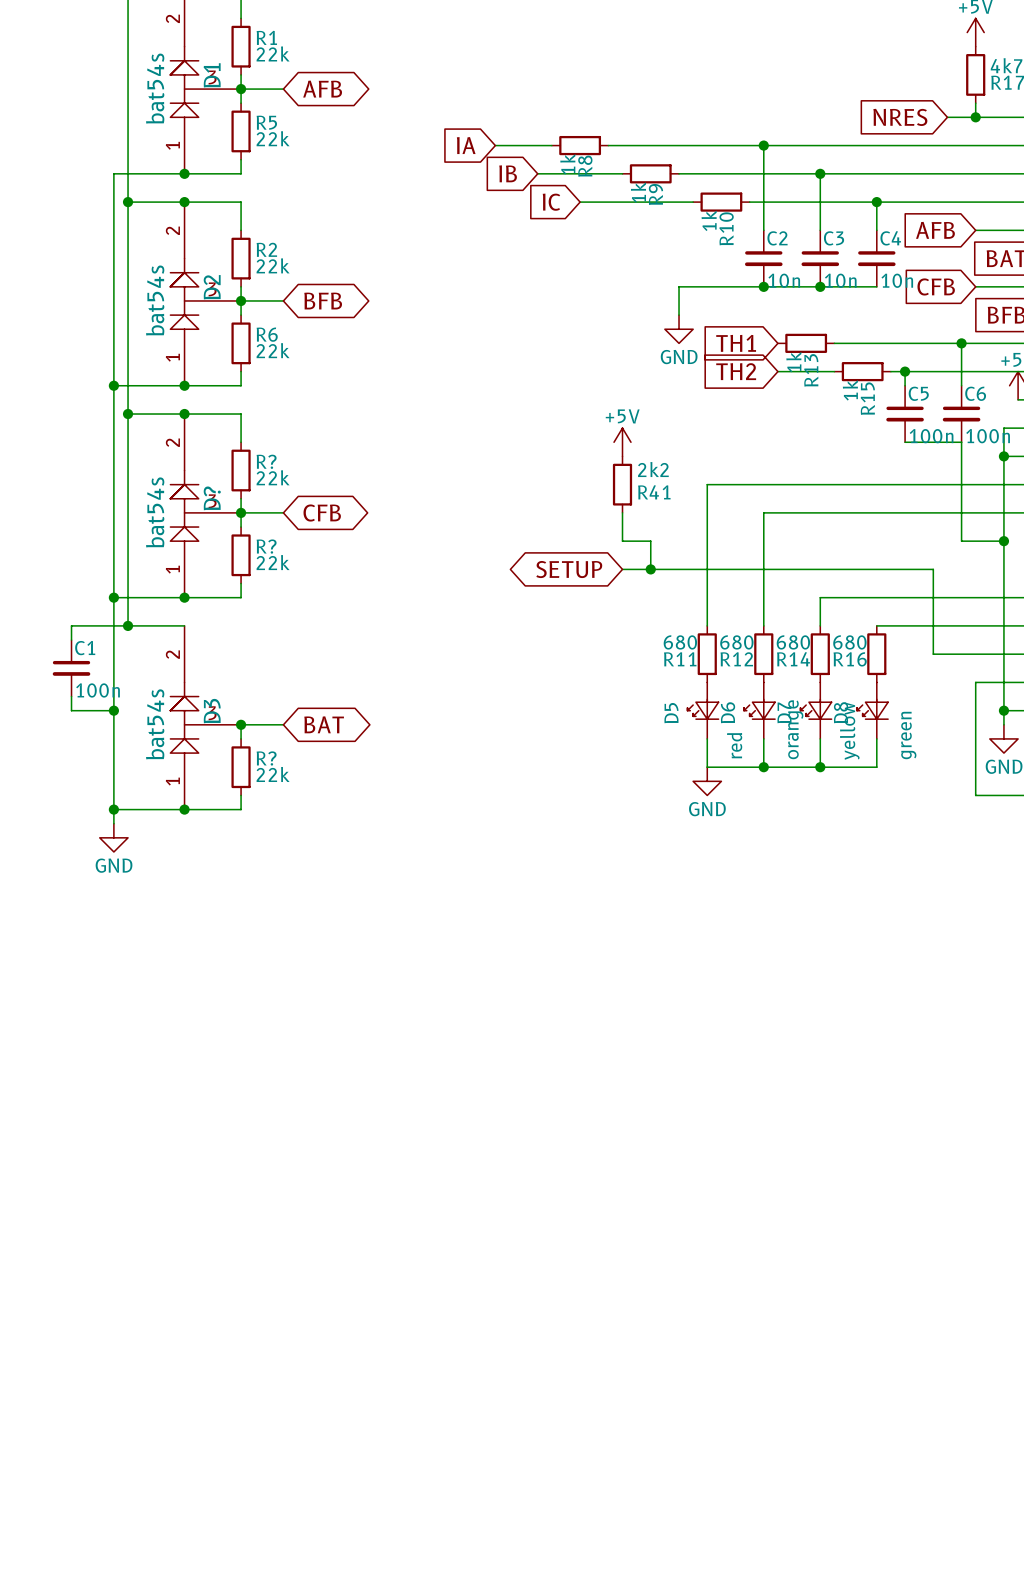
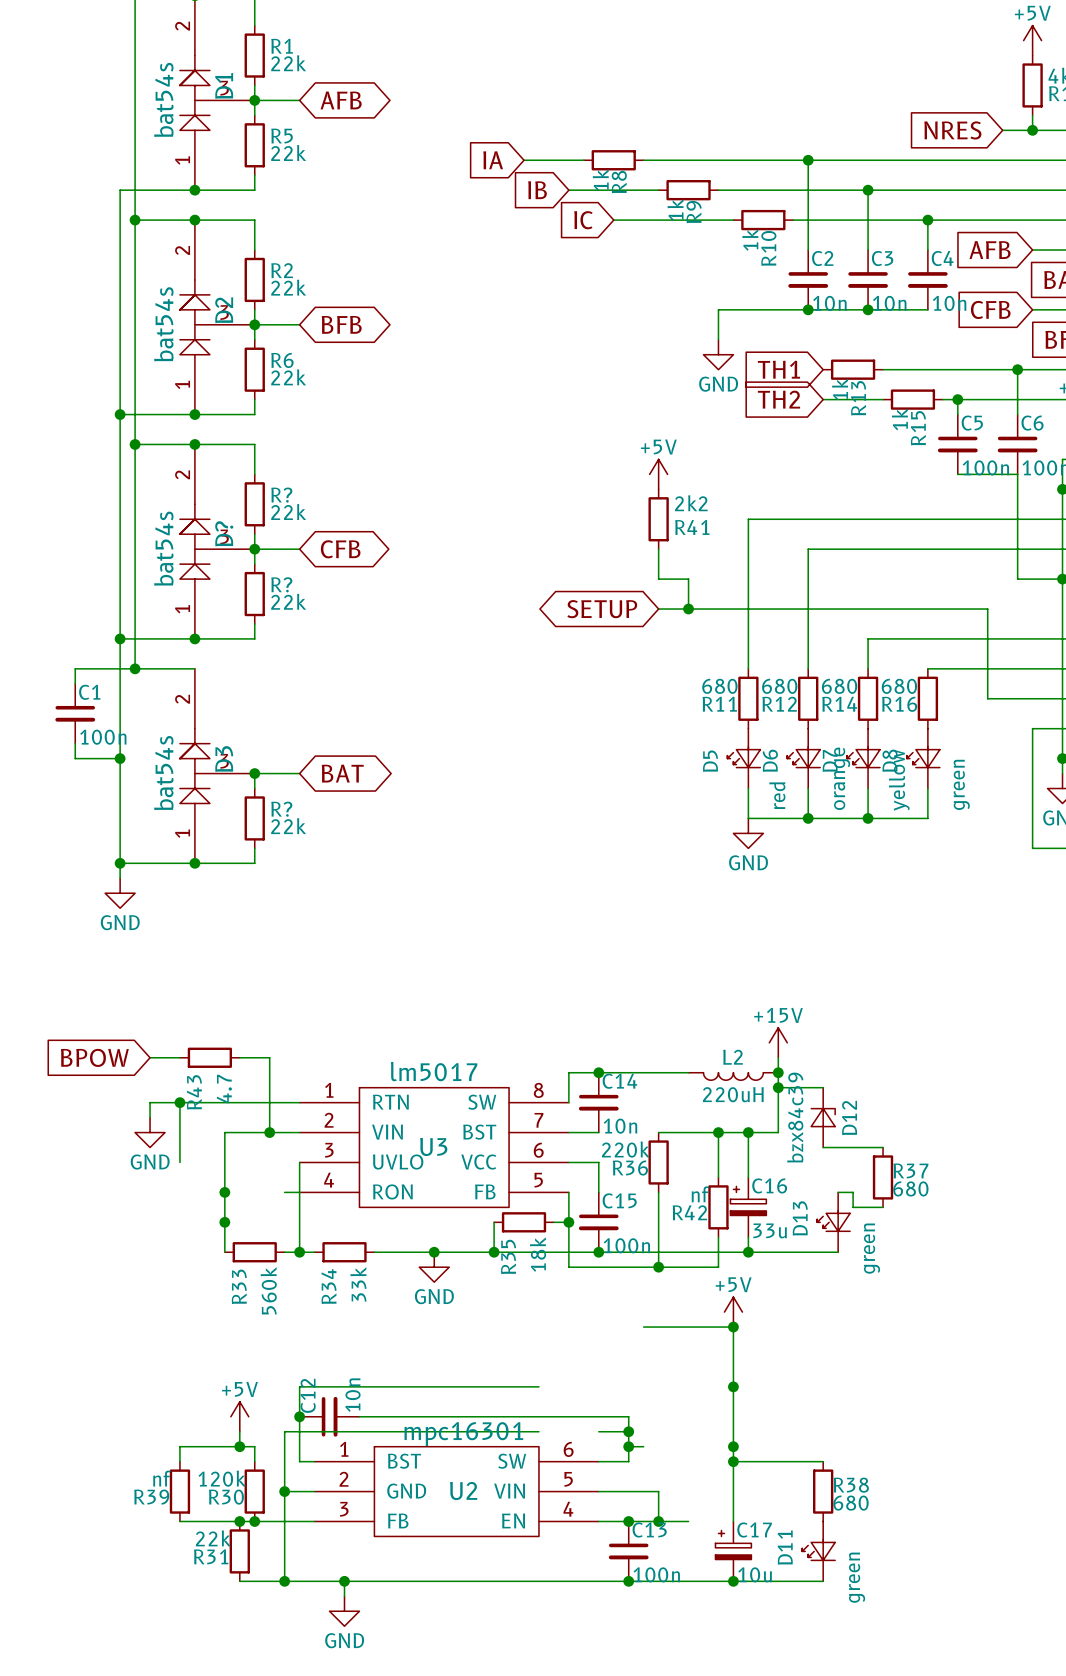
power symbol: none -> +15V (778, 1042)
global label: none -> BPOW (94, 1057)
wire: none -> (150, 1057) (179, 1057)
R43: none -> 4.7 (209, 1057)
wire: none -> (239, 1057) (269, 1057) (269, 1132)
wire: none -> (778, 1057) (778, 1132) (658, 1132)
junction: none -> (598, 1072)
wire: none -> (688, 1072) (568, 1072) (568, 1102)
junction: none -> (778, 1072)
L2: none -> 220uH (733, 1076)
wire: none -> (778, 1087) (823, 1087)
junction: none -> (778, 1087)
wire: none -> (179, 1102) (179, 1162)
junction: none -> (179, 1102)
wire: none -> (299, 1102) (150, 1102) (150, 1117)
C14: none -> 10n (598, 1102)
D12: none -> bzx84c39 (823, 1117)
power symbol: none -> GND (150, 1132)
junction: none -> (269, 1132)
wire: none -> (299, 1132) (224, 1132) (224, 1252)
wire: none -> (568, 1132) (598, 1132)
wire: none -> (718, 1132) (718, 1177)
junction: none -> (718, 1132)
wire: none -> (748, 1132) (748, 1177)
junction: none -> (748, 1132)
U3: none -> lm5017 (434, 1147)
wire: none -> (823, 1147) (883, 1147)
wire: none -> (299, 1162) (299, 1252)
wire: none -> (568, 1162) (598, 1162) (598, 1192)
R36: none -> 220k (658, 1162)
R37: none -> 680 (883, 1177)
junction: none -> (224, 1192)
wire: none -> (284, 1192) (299, 1192)
wire: none -> (568, 1192) (568, 1267) (718, 1267) (718, 1237)
wire: none -> (658, 1192) (658, 1267)
wire: none -> (838, 1192) (853, 1192) (853, 1207) (883, 1207)
R42: none -> nf (718, 1207)
C16: none -> 33u (748, 1207)
junction: none -> (224, 1222)
wire: none -> (494, 1222) (494, 1252)
R35: none -> 18k (524, 1222)
wire: none -> (553, 1222) (568, 1222)
junction: none -> (568, 1222)
C15: none -> 100n (598, 1222)
D13: none -> green (833, 1222)
wire: none -> (748, 1237) (748, 1252)
R33: none -> 560k (254, 1252)
wire: none -> (284, 1252) (314, 1252)
junction: none -> (299, 1252)
R34: none -> 33k (344, 1252)
wire: none -> (374, 1252) (838, 1252)
junction: none -> (434, 1252)
junction: none -> (494, 1252)
junction: none -> (598, 1252)
junction: none -> (748, 1252)
power symbol: none -> GND (434, 1267)
junction: none -> (658, 1267)
power symbol: none -> +5V (733, 1312)
wire: none -> (643, 1327) (733, 1327) (733, 1521)
junction: none -> (733, 1327)
wire: none -> (538, 1386) (299, 1386) (299, 1461) (314, 1461)
junction: none -> (733, 1386)
power symbol: none -> +5V (239, 1416)
junction: none -> (299, 1416)
C12: none -> 10n (329, 1416)
wire: none -> (359, 1416) (628, 1416) (628, 1461) (598, 1461)
wire: none -> (239, 1431) (239, 1446)
wire: none -> (538, 1431) (284, 1431) (284, 1581)
wire: none -> (598, 1431) (628, 1431)
junction: none -> (628, 1431)
junction: none -> (239, 1446)
wire: none -> (628, 1446) (643, 1446)
junction: none -> (628, 1446)
junction: none -> (733, 1446)
wire: none -> (179, 1461) (179, 1446) (254, 1446) (254, 1461)
wire: none -> (733, 1461) (823, 1461)
junction: none -> (733, 1461)
R39: none -> nf (179, 1491)
R30: none -> 120k (254, 1491)
wire: none -> (284, 1491) (314, 1491)
junction: none -> (284, 1491)
U2: none -> mpc16301 (456, 1491)
wire: none -> (598, 1491) (658, 1491) (658, 1521)
R38: none -> 680 (823, 1491)
wire: none -> (179, 1521) (314, 1521)
junction: none -> (239, 1521)
junction: none -> (254, 1521)
wire: none -> (598, 1521) (688, 1521)
junction: none -> (628, 1521)
junction: none -> (658, 1521)
R31: none -> 22k (239, 1551)
C13: none -> 100n (628, 1551)
C17: none -> 10u (733, 1551)
D11: none -> green (818, 1551)
wire: none -> (239, 1581) (823, 1581)
junction: none -> (284, 1581)
wire: none -> (344, 1581) (344, 1596)
junction: none -> (344, 1581)
junction: none -> (628, 1581)
junction: none -> (733, 1581)
power symbol: none -> GND (344, 1611)

